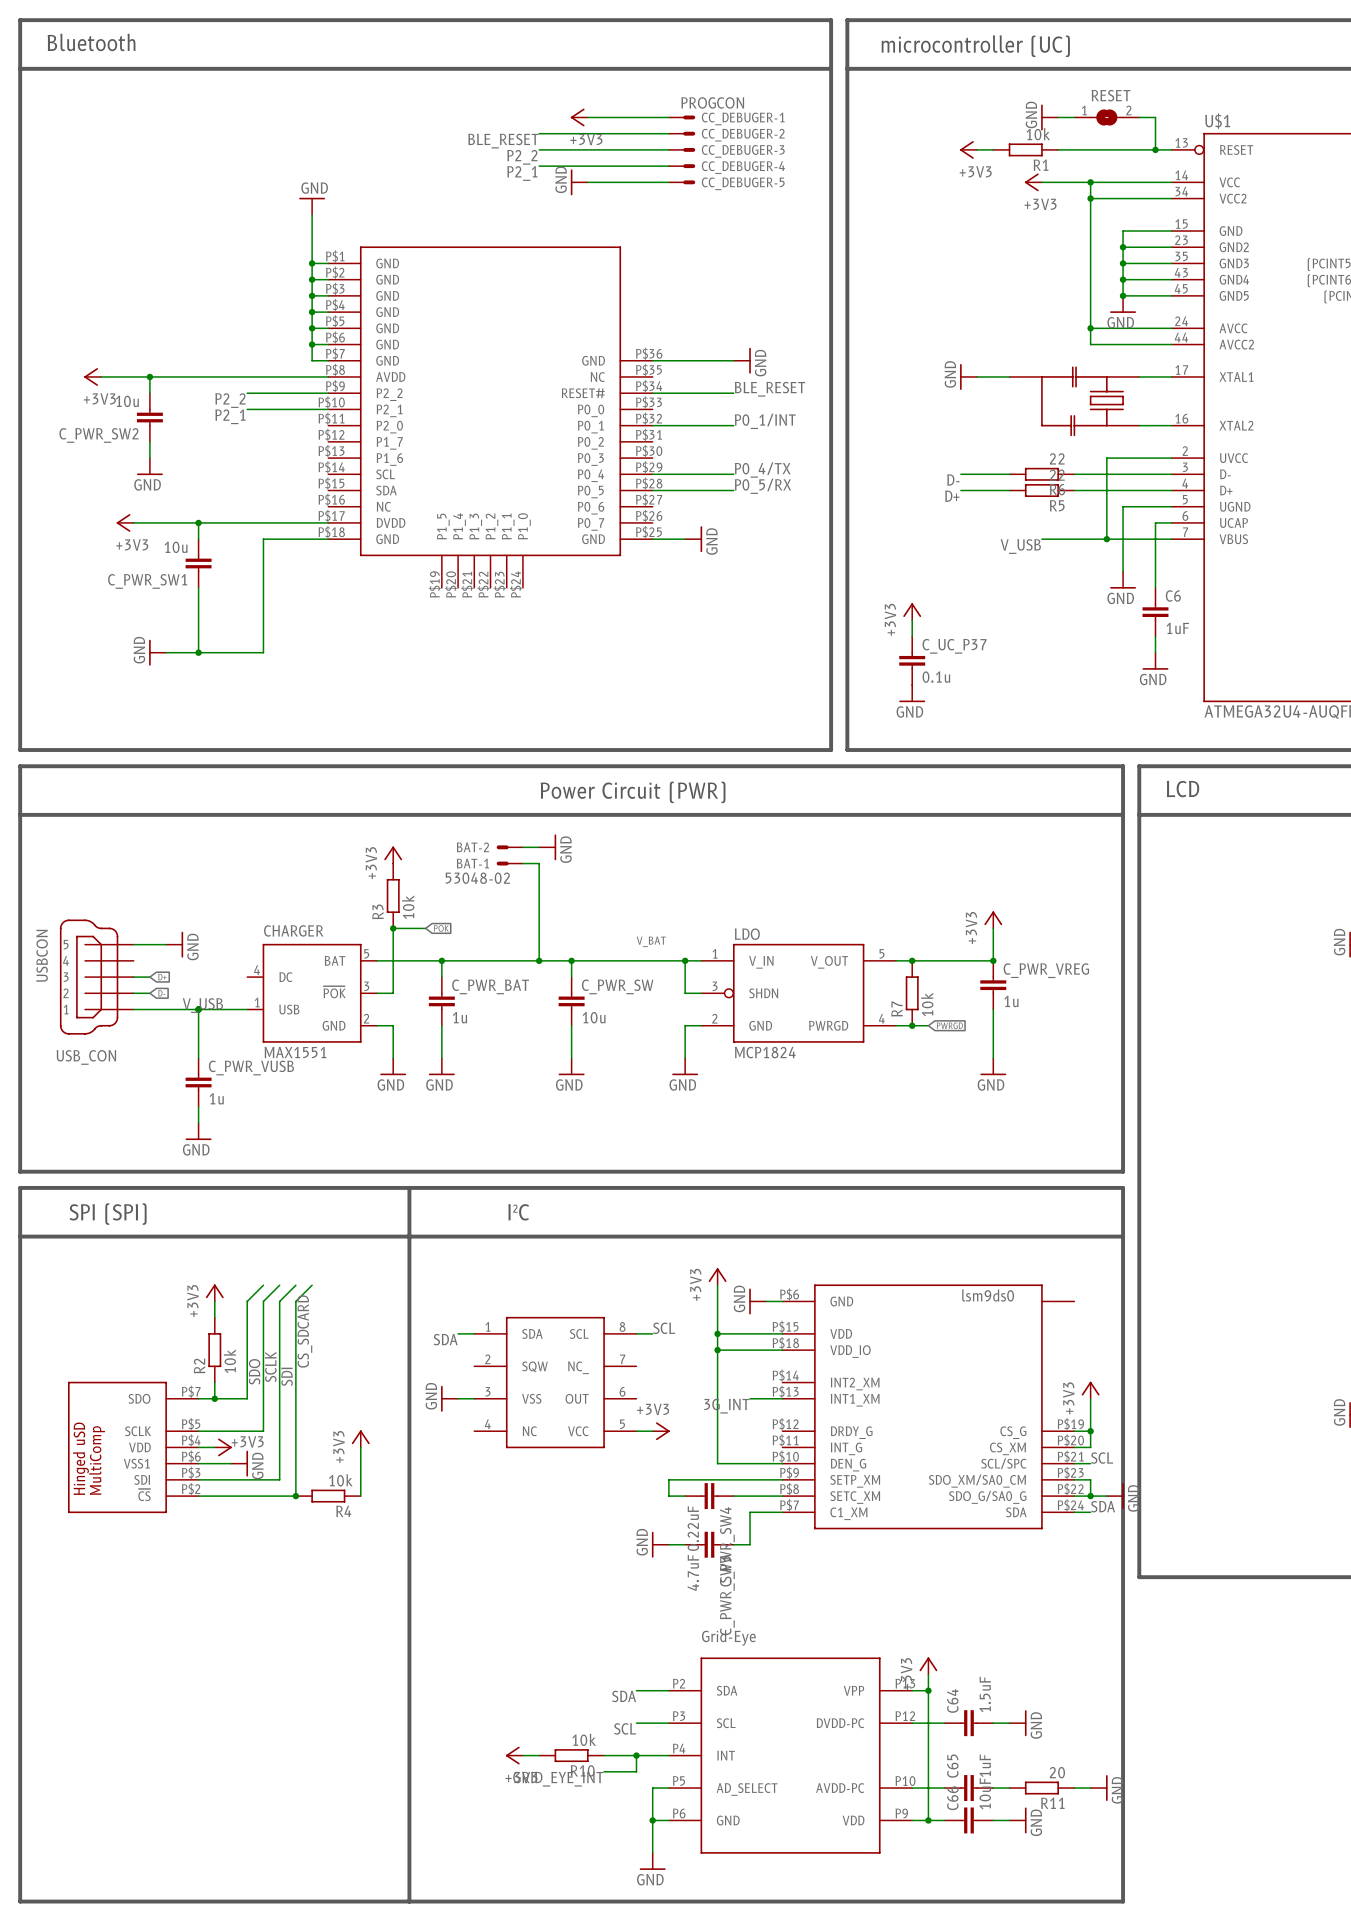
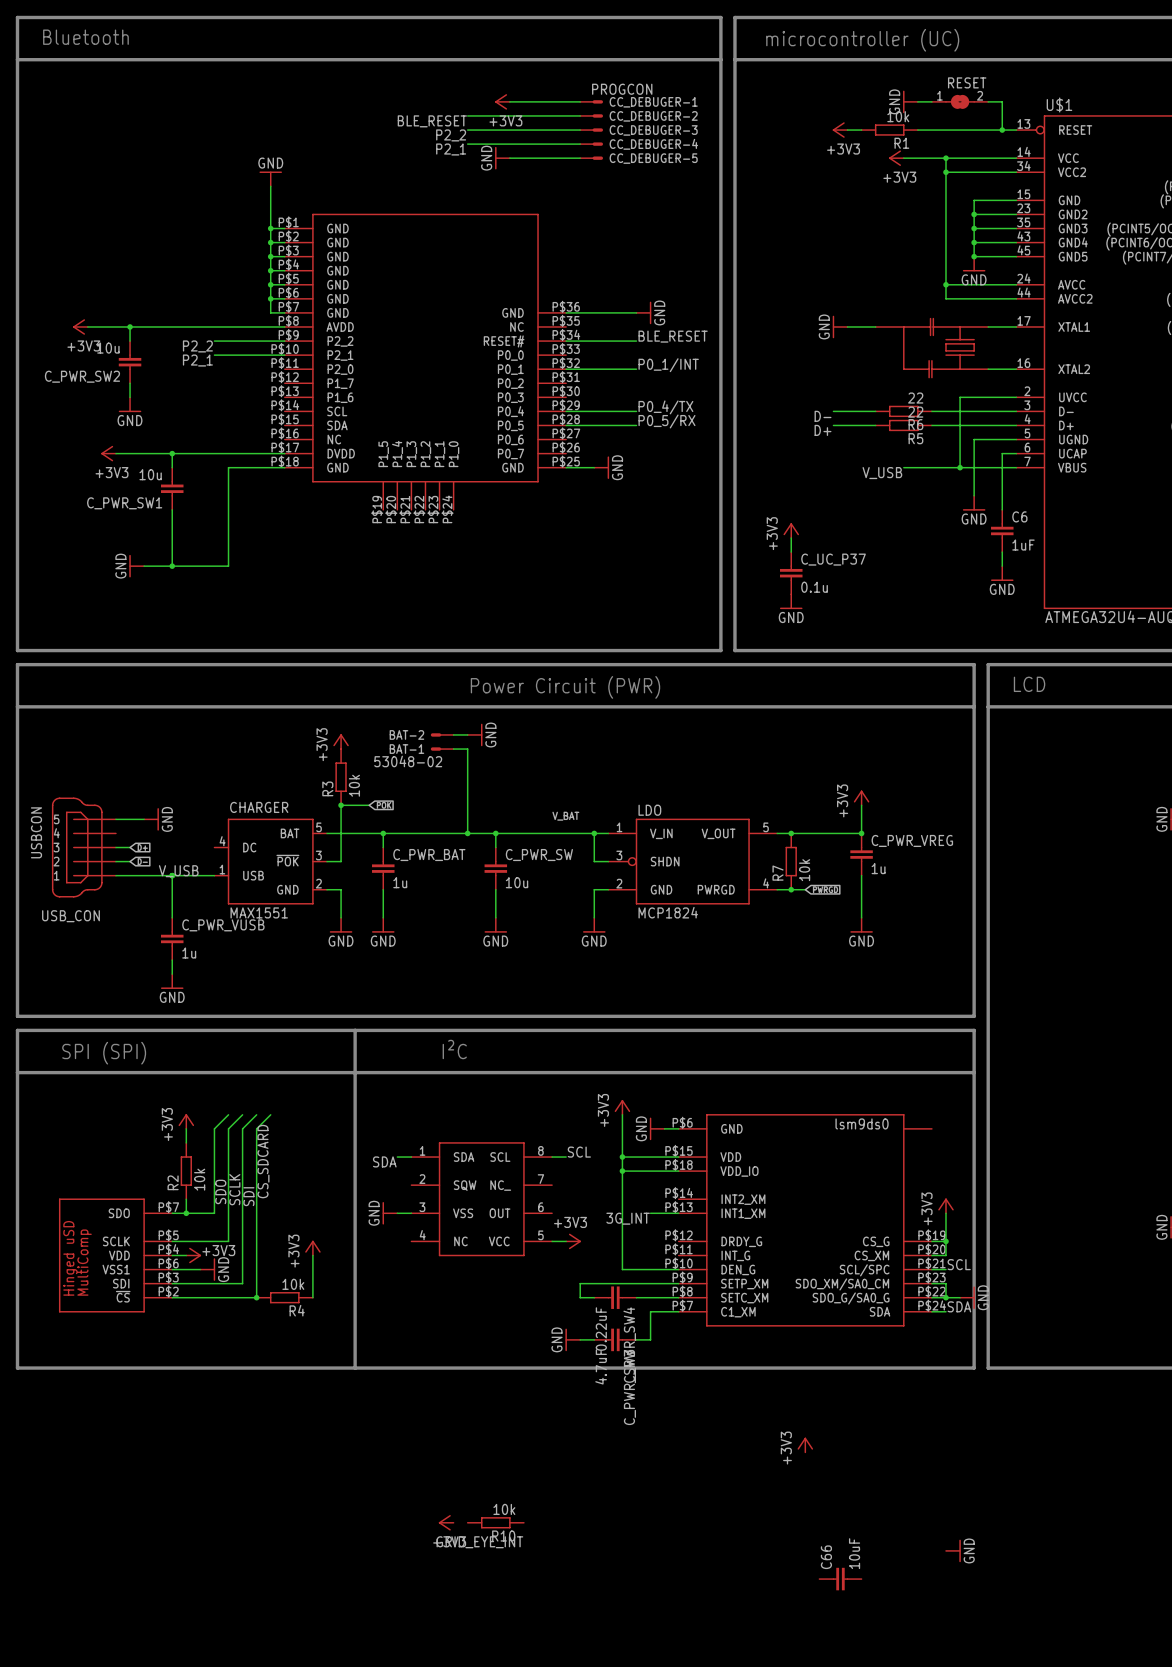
line: (20, 1577) (20, 1901) (1123, 1901) (1123, 1577) -> (17, 1368) (974, 1368)
line: (409, 1577) (409, 1901) -> none
wire: (928, 1674) (928, 1820) -> none
wire: (636, 1690) (668, 1690) -> none
wire: (912, 1690) (928, 1690) -> none
junction: (928, 1690) -> none
label: SDA (624, 1696) -> none
wire: (636, 1723) (668, 1723) -> none
wire: (912, 1723) (944, 1723) -> none
C64: 1.5uF (968, 1723) -> none
wire: (993, 1723) (1009, 1723) -> none
power symbol: GND (1018, 1723) -> none
label: SCL (625, 1728) -> none
wire: (522, 1755) (539, 1755) -> none
wire: (604, 1755) (668, 1755) -> none
wire: (636, 1755) (636, 1771) (604, 1771) -> none
junction: (636, 1755) -> none
part: (790, 1755) -> none
wire: (668, 1788) (652, 1788) (652, 1852) -> none
wire: (912, 1788) (944, 1788) -> none
C65: 1uF (968, 1788) -> none
wire: (993, 1788) (1009, 1788) -> none
R11: 20 (1041, 1788) -> none
wire: (1074, 1788) (1090, 1788) -> none
wire: (652, 1820) (668, 1820) -> none
junction: (652, 1820) -> none
wire: (912, 1820) (944, 1820) -> none
junction: (928, 1820) -> none
wire: (993, 1820) (1009, 1820) -> none
power symbol: GND (1018, 1820) -> none
power symbol: GND (652, 1861) -> none

